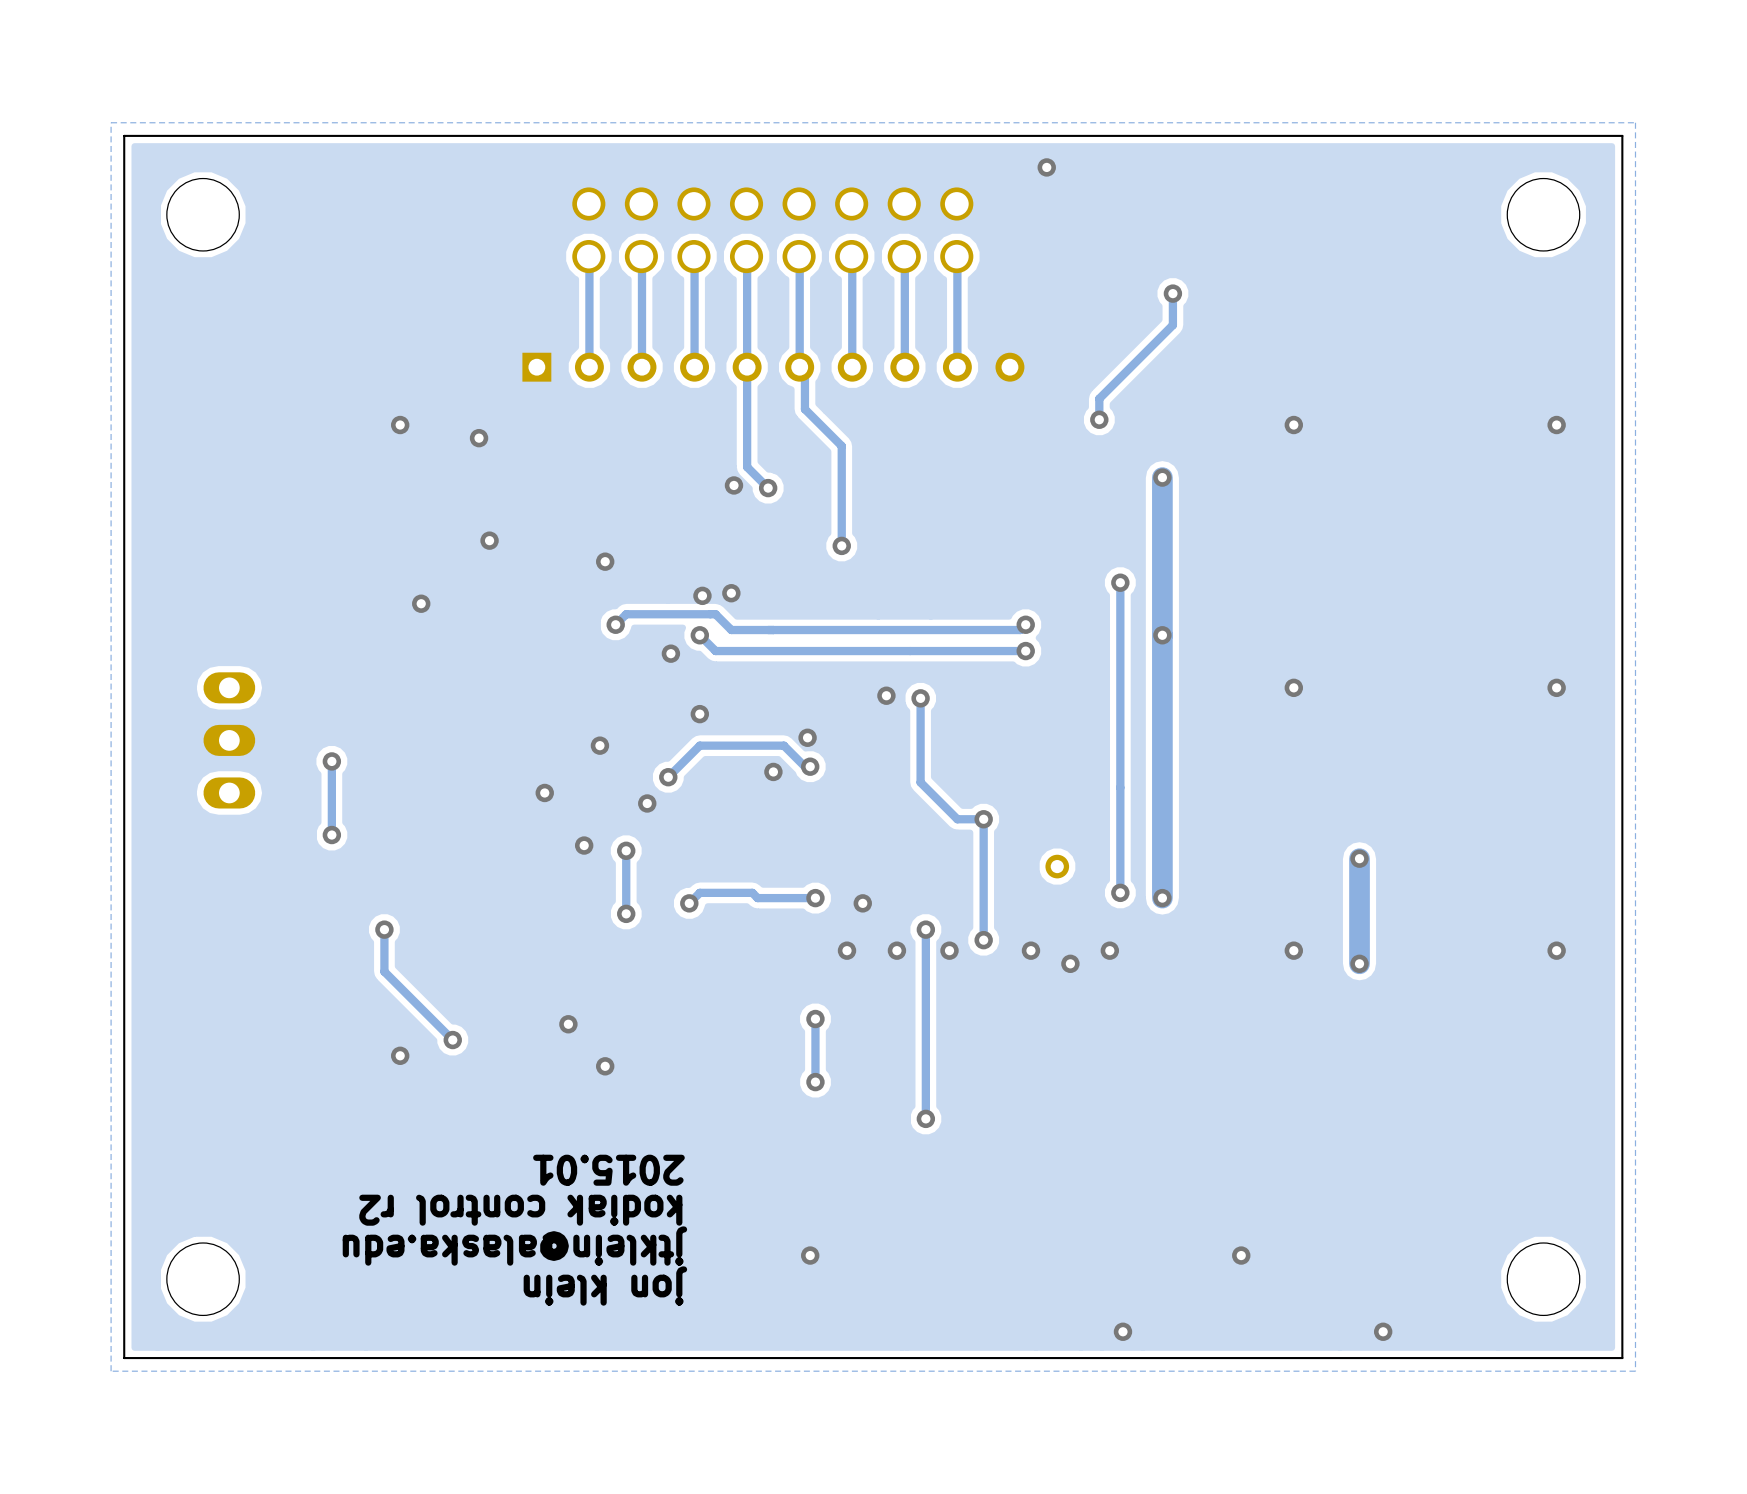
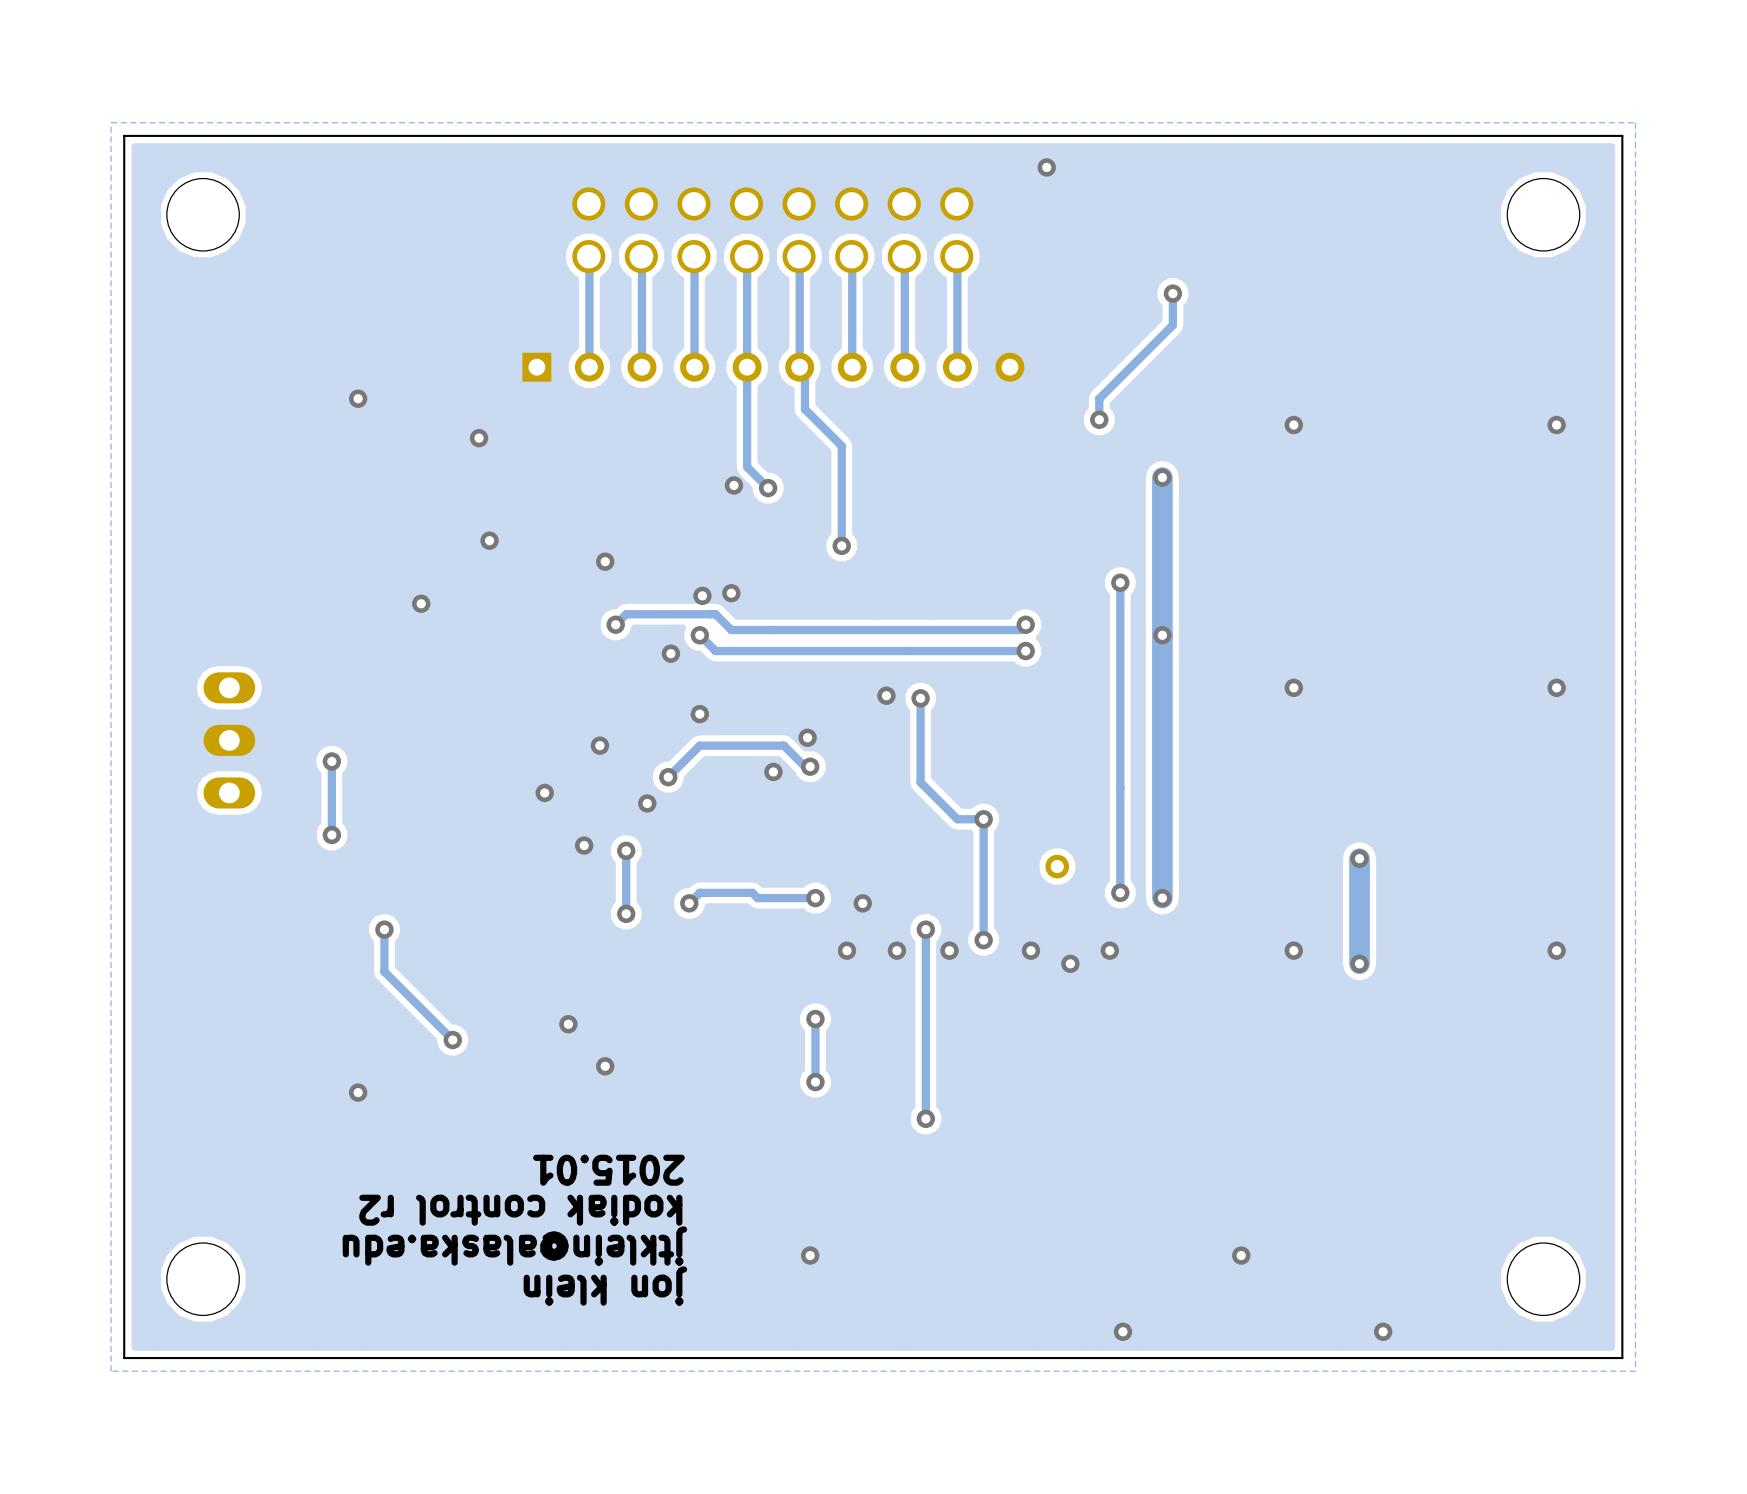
via position: (400, 425) -> (358, 398)
via position: (400, 1055) -> (358, 1092)

